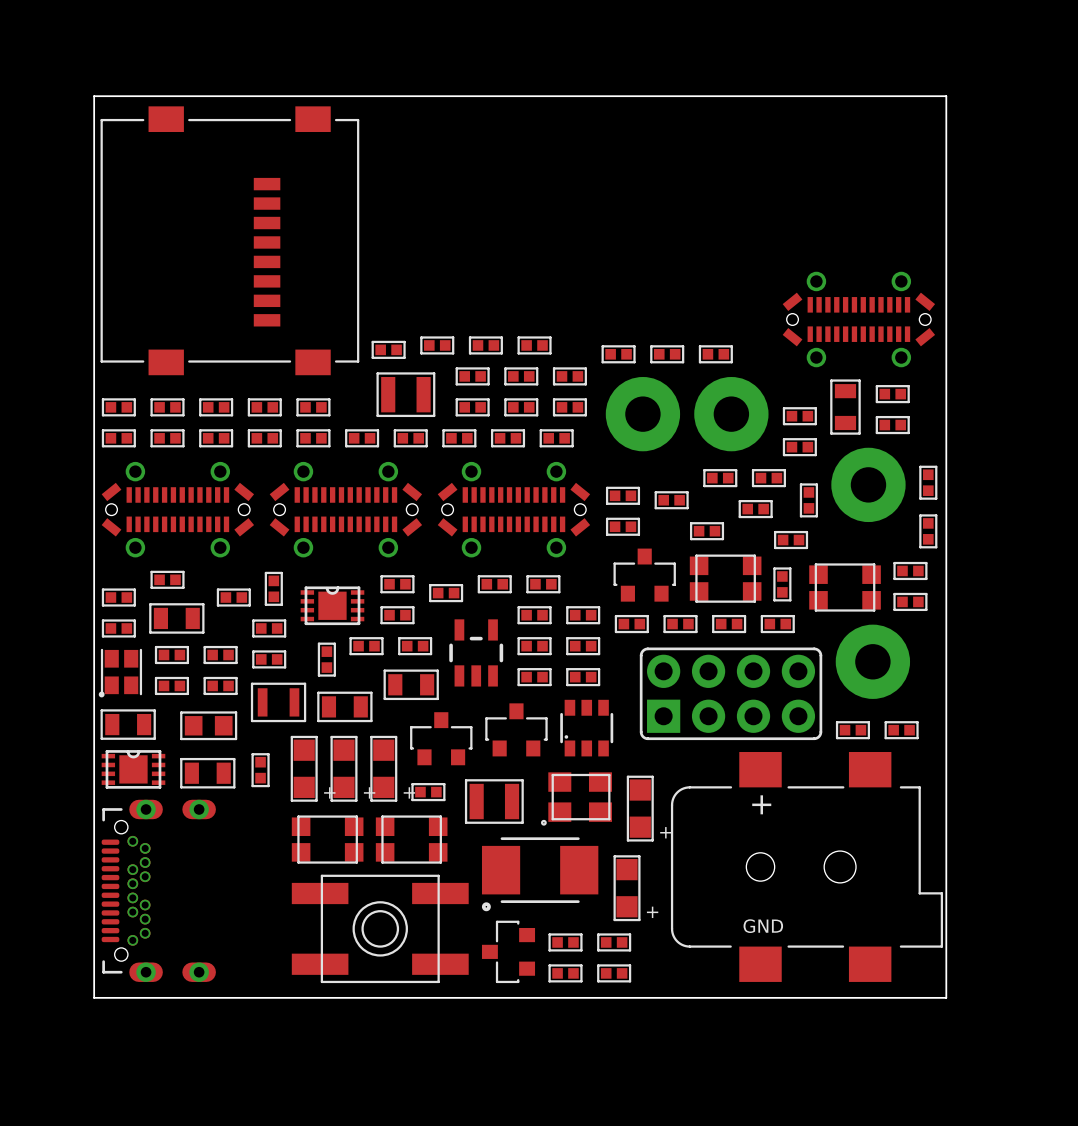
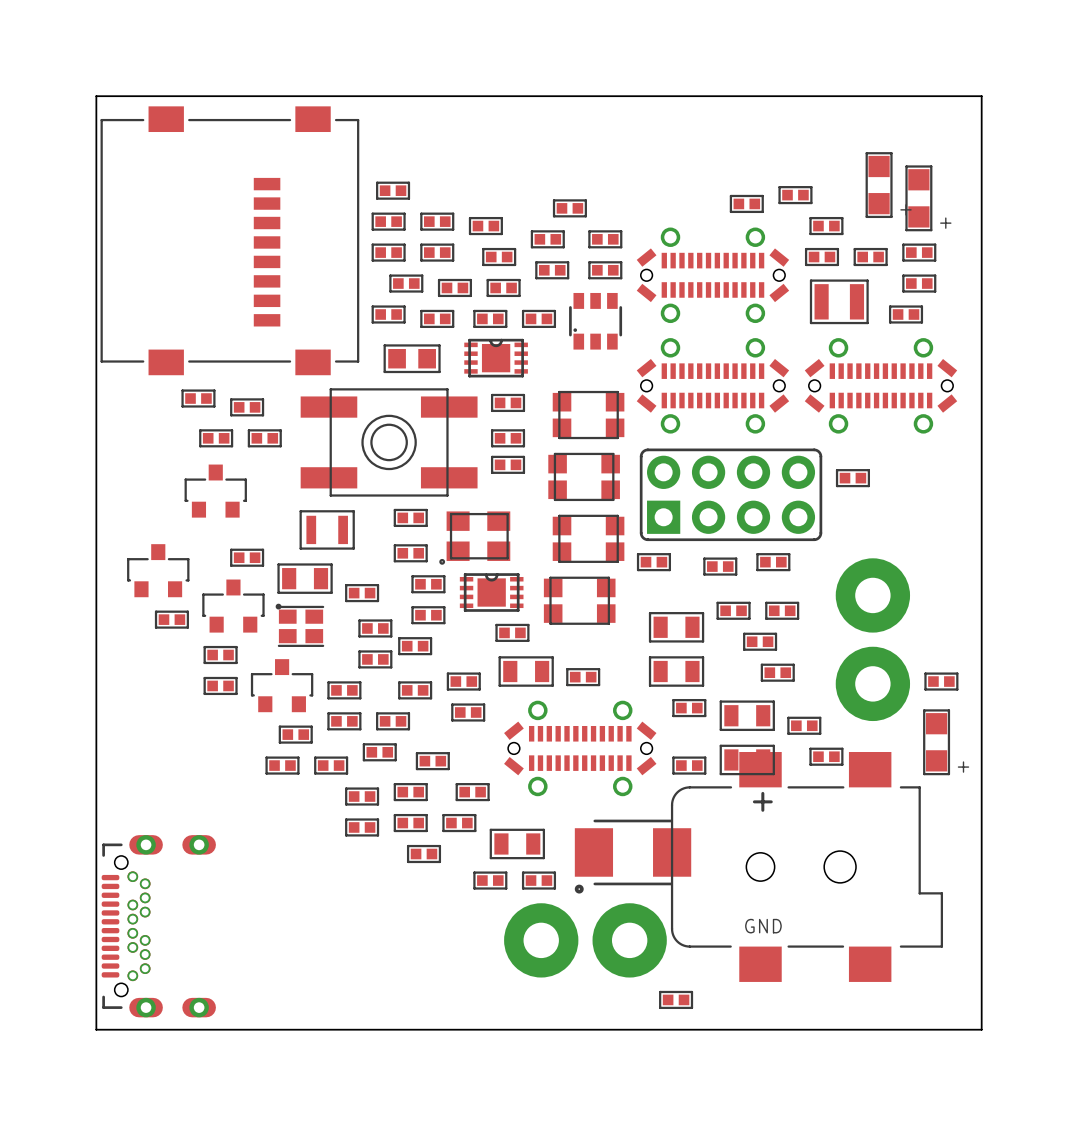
board edge: (96, 96) (94, 96) (94, 997) (946, 997) (946, 96) -> (96, 96) (96, 1029) (981, 1029) (981, 96) (946, 96)
part: none -> (879, 185)
part: none -> (393, 190)
part: none -> (795, 195)
part: none -> (918, 198)
part: none -> (746, 203)
part: none -> (569, 208)
part: none -> (388, 221)
part: none -> (437, 221)
part: none -> (485, 226)
part: none -> (826, 226)
part: none -> (547, 239)
part: none -> (605, 239)
part: none -> (388, 252)
part: none -> (437, 252)
part: none -> (919, 252)
part: none -> (499, 257)
part: none -> (822, 257)
part: none -> (870, 257)
part: none -> (552, 270)
part: none -> (605, 270)
part: none -> (712, 275)
part: none -> (406, 283)
part: none -> (919, 283)
part: none -> (454, 287)
part: none -> (503, 287)
part: none -> (839, 301)
part: none -> (388, 314)
part: none -> (906, 314)
part: none -> (490, 318)
part: none -> (538, 318)
part: (858, 319) -> none
part position: (437, 345) -> (437, 318)
part: (485, 345) -> none
part: (534, 345) -> none
part: (388, 349) -> none
part: (618, 354) -> none
part: (667, 354) -> none
part: (715, 354) -> none
part: none -> (496, 358)
part: (472, 376) -> none
part: (521, 376) -> none
part: (569, 376) -> none
part: none -> (712, 385)
part footprint: [875, 385, 910, 404] -> [804, 338, 958, 434]
part: (405, 394) -> none
part: none -> (198, 398)
part: (118, 407) -> none
part: (167, 407) -> none
part: (216, 407) -> none
part: none -> (247, 407)
part: (264, 407) -> none
part: (313, 407) -> none
part: (472, 407) -> none
part position: (521, 407) -> (508, 402)
part: (569, 407) -> none
part: (845, 407) -> none
part: (642, 414) -> none
part: (731, 414) -> none
part: none -> (588, 415)
part: (799, 416) -> none
part: (892, 425) -> none
part: (118, 438) -> none
part: (167, 438) -> none
part: (313, 438) -> none
part: (362, 438) -> none
part: (410, 438) -> none
part: (459, 438) -> none
part: (556, 438) -> none
part: none -> (389, 442)
part: (799, 447) -> none
part footprint: [831, 447, 906, 523] -> [835, 469, 871, 488]
part: none -> (508, 464)
part: none -> (584, 476)
part: (720, 478) -> none
part: (768, 478) -> none
part: (928, 482) -> none
part: none -> (215, 491)
part: (623, 495) -> none
part: (671, 500) -> none
part: (808, 500) -> none
part: (177, 509) -> none
part: (345, 509) -> none
part: (513, 509) -> none
part: (755, 509) -> none
part: none -> (410, 517)
part: (623, 526) -> none
part: (707, 531) -> none
part: (928, 531) -> none
part: none -> (588, 538)
part: (791, 540) -> none
part footprint: [613, 548, 676, 602] -> [636, 553, 672, 572]
part: none -> (410, 553)
part footprint: [689, 554, 762, 603] -> [703, 557, 738, 576]
part: none -> (247, 557)
part: none -> (773, 562)
part footprint: [150, 570, 185, 589] -> [127, 544, 190, 598]
part: (910, 570) -> none
part footprint: [477, 575, 512, 594] -> [459, 573, 524, 612]
part: none -> (305, 578)
part: (397, 584) -> none
part: none -> (428, 584)
part: (543, 584) -> none
part: (782, 584) -> none
part: (845, 587) -> none
part footprint: [216, 588, 251, 607] -> [202, 579, 265, 633]
part: (273, 588) -> none
part: none -> (362, 593)
part: (446, 593) -> none
part: none -> (872, 595)
part: (118, 597) -> none
part: (910, 601) -> none
part footprint: [149, 603, 205, 634] -> [154, 610, 189, 629]
part: (332, 605) -> none
part footprint: [566, 606, 601, 625] -> [543, 576, 616, 625]
part: none -> (782, 610)
part footprint: [663, 614, 698, 634] -> [648, 612, 705, 643]
part: (397, 615) -> none
part: none -> (428, 615)
part: (534, 615) -> none
part: (631, 624) -> none
part position: (729, 624) -> (733, 610)
part: (777, 624) -> none
part: (118, 628) -> none
part: (269, 628) -> none
part: none -> (375, 628)
part: none -> (512, 632)
part: none -> (760, 641)
part: (366, 646) -> none
part: (534, 646) -> none
part: (583, 646) -> none
part: (476, 652) -> none
part: (171, 655) -> none
part: (269, 659) -> none
part: (326, 659) -> none
part: none -> (375, 659)
part position: (872, 661) -> (872, 683)
part footprint: [517, 668, 552, 687] -> [498, 656, 554, 687]
part footprint: [383, 669, 439, 701] -> [398, 681, 433, 700]
part: none -> (676, 671)
part: none -> (777, 672)
part rotation: 0° (120, 673) -> 90° clockwise (299, 625)
part position: (120, 673) -> (299, 625)
part: none -> (463, 681)
part: none -> (941, 681)
part: (171, 685) -> none
part: none -> (282, 685)
part: none -> (344, 690)
part position: (731, 693) -> (731, 494)
part position: (278, 702) -> (327, 529)
part: (344, 706) -> none
part: none -> (689, 708)
part: none -> (468, 712)
part: none -> (747, 715)
part: none -> (344, 721)
part: none -> (393, 721)
part: (128, 724) -> none
part position: (208, 725) -> (412, 358)
part: none -> (804, 725)
part position: (586, 728) -> (595, 321)
part: (516, 729) -> none
part: (852, 730) -> none
part: (901, 730) -> none
part: none -> (295, 734)
part footprint: [330, 735, 358, 802] -> [314, 756, 349, 775]
part footprint: [370, 735, 398, 802] -> [362, 743, 397, 762]
part: (441, 738) -> none
part: none -> (936, 742)
part: none -> (580, 748)
part: none -> (826, 756)
part: none -> (747, 759)
part: none -> (432, 761)
part: none -> (689, 765)
part: (304, 768) -> none
part: (133, 769) -> none
part rotation: 0° (260, 770) -> 90° clockwise (282, 765)
part position: (260, 770) -> (282, 765)
part: (207, 773) -> none
part: none -> (410, 792)
part: (428, 792) -> none
part: none -> (472, 792)
part: none -> (362, 796)
part position: (576, 798) -> (474, 538)
part: (494, 801) -> none
part: (640, 808) -> none
part: none -> (410, 823)
part: none -> (459, 823)
part: none -> (362, 827)
part footprint: [481, 837, 599, 912] -> [521, 871, 557, 890]
part: (327, 839) -> none
part: (411, 839) -> none
part: none -> (517, 843)
part: none -> (424, 854)
part: none -> (633, 856)
part: none -> (490, 880)
part: (627, 888) -> none
part position: (158, 890) -> (158, 926)
part: (380, 928) -> none
part footprint: [597, 933, 632, 952] -> [592, 903, 667, 978]
part: none -> (541, 940)
part: (565, 942) -> none
part: (508, 951) -> none
part: (565, 973) -> none
part: (614, 973) -> none
part: none -> (676, 999)

